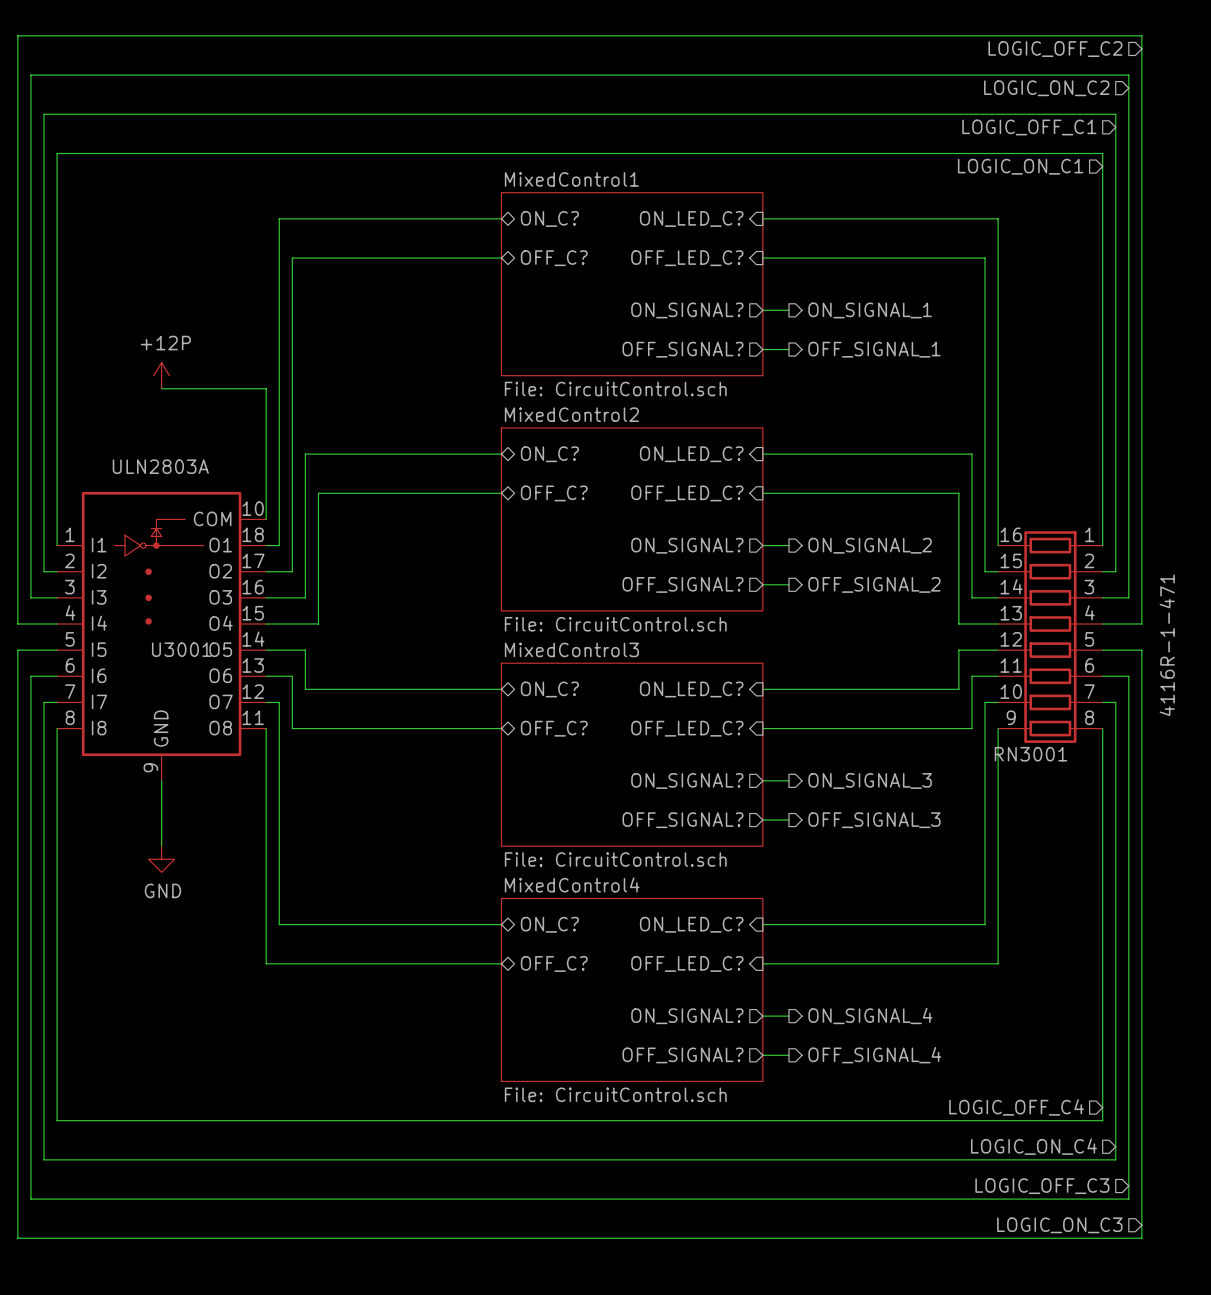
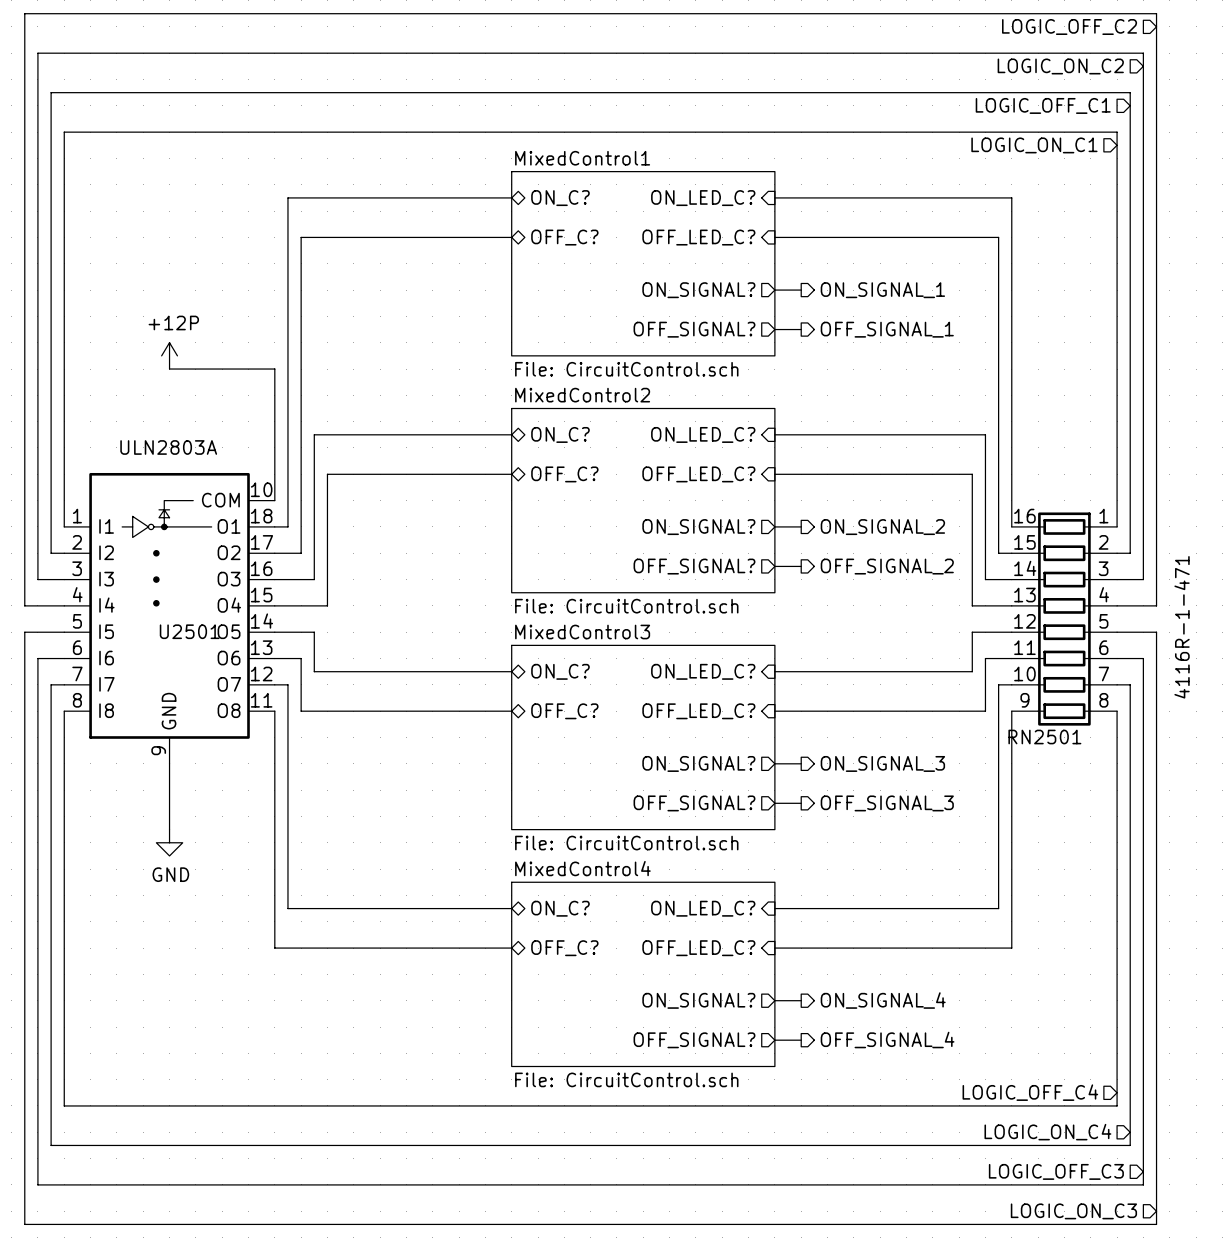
U3001 name: U3001 (181, 649) -> U2501 (189, 631)
RN3001 name: RN3001 (1030, 754) -> RN2501 (1044, 737)

